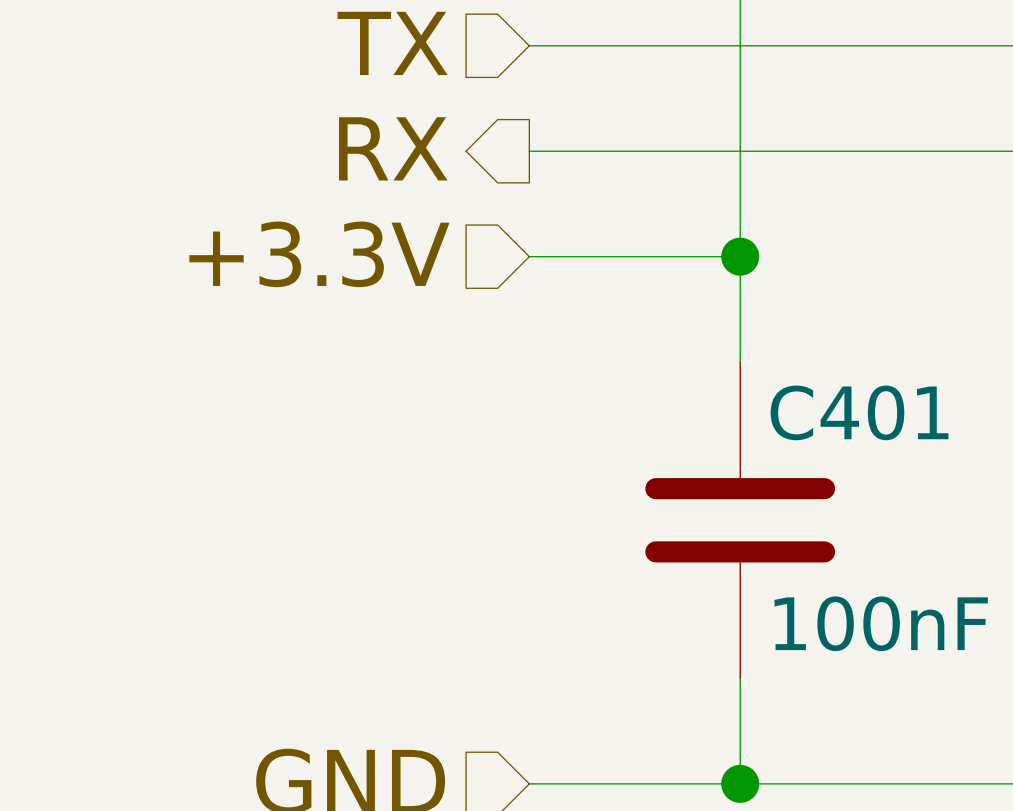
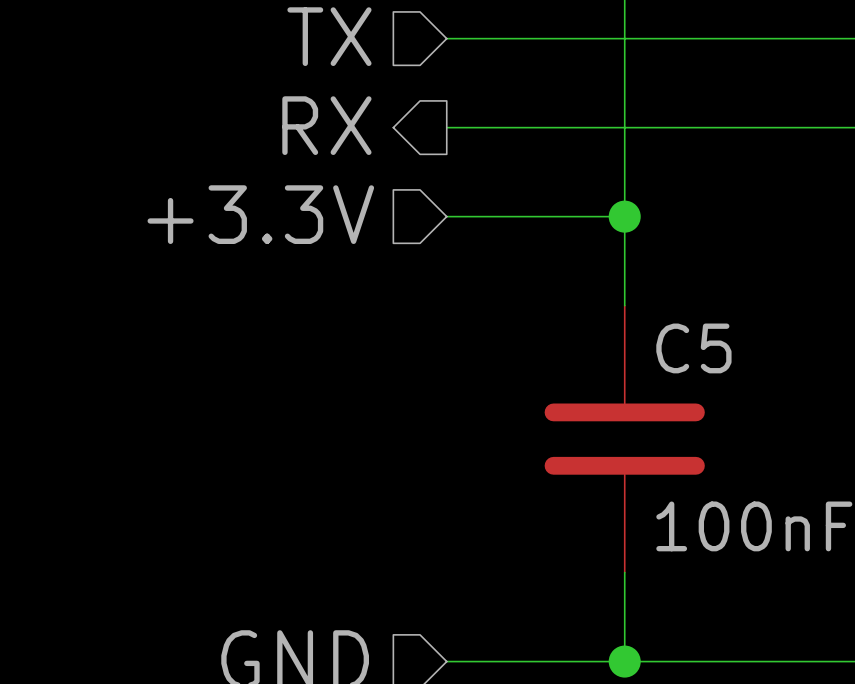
C401 name: C401 (859, 412) -> C5 (693, 348)

